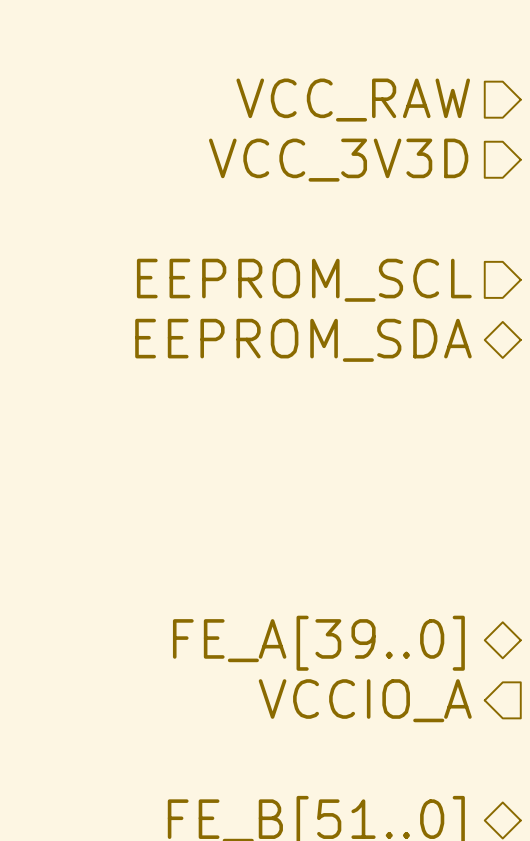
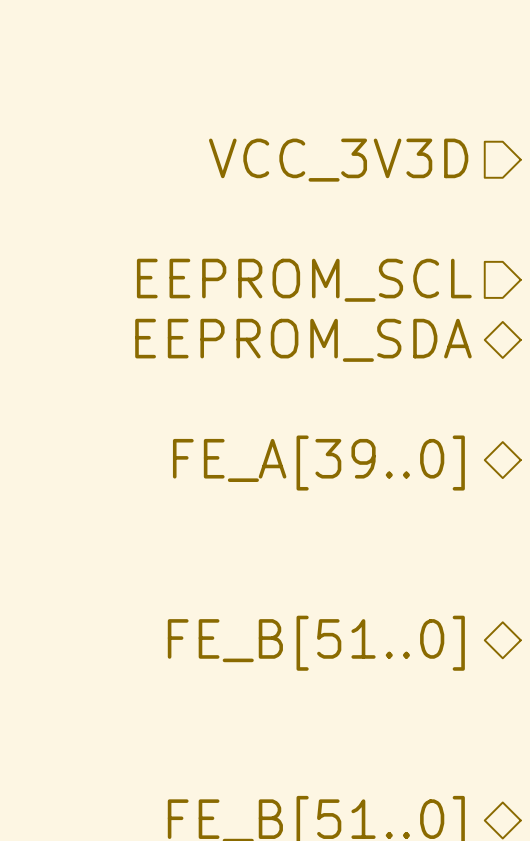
hierarchical label: VCC_RAW (353, 100) -> none
hierarchical label: none -> FE_A[39..0] (318, 463)
hierarchical label: FE_A[39..0] (318, 643) -> FE_B[51..0] (316, 643)
hierarchical label: VCCIO_A (365, 700) -> none

